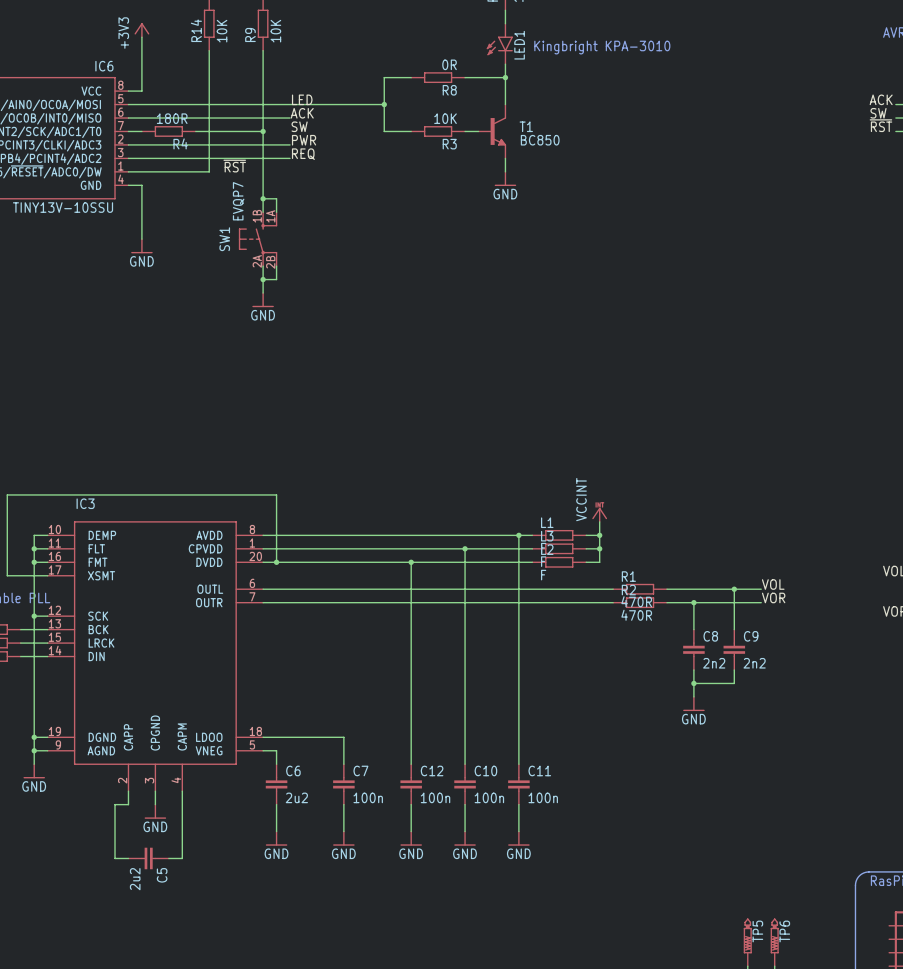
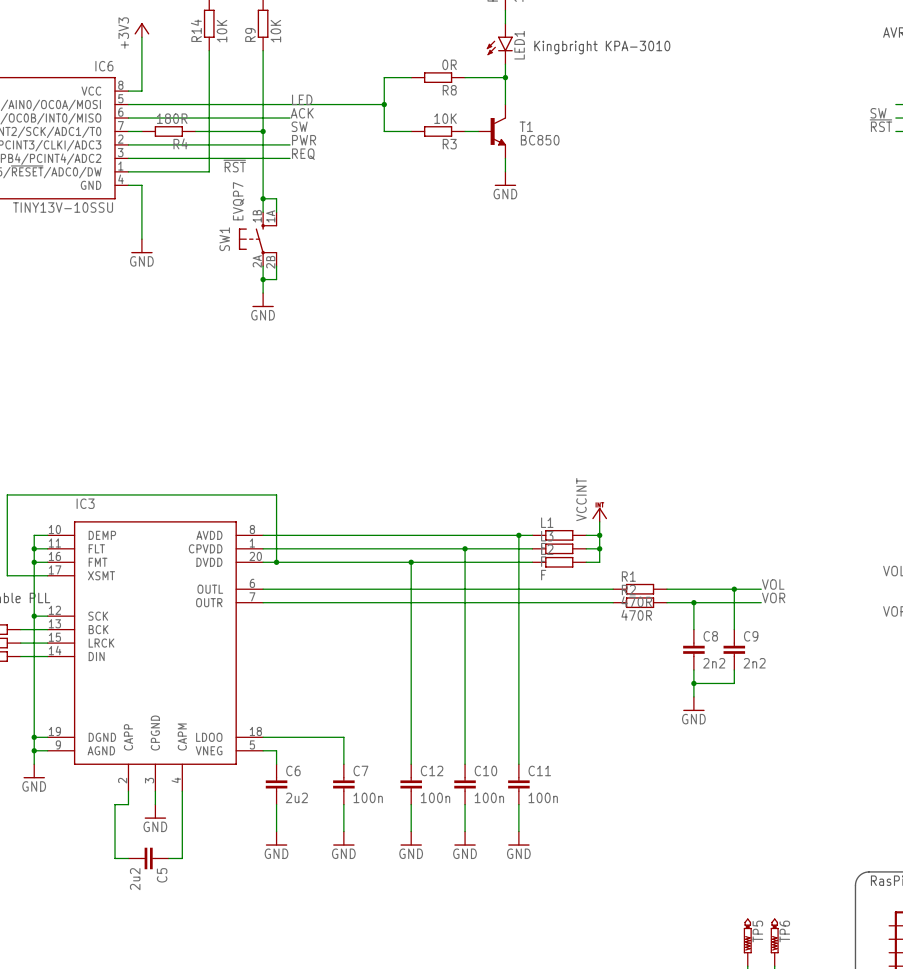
label: ACK (881, 99) -> none

